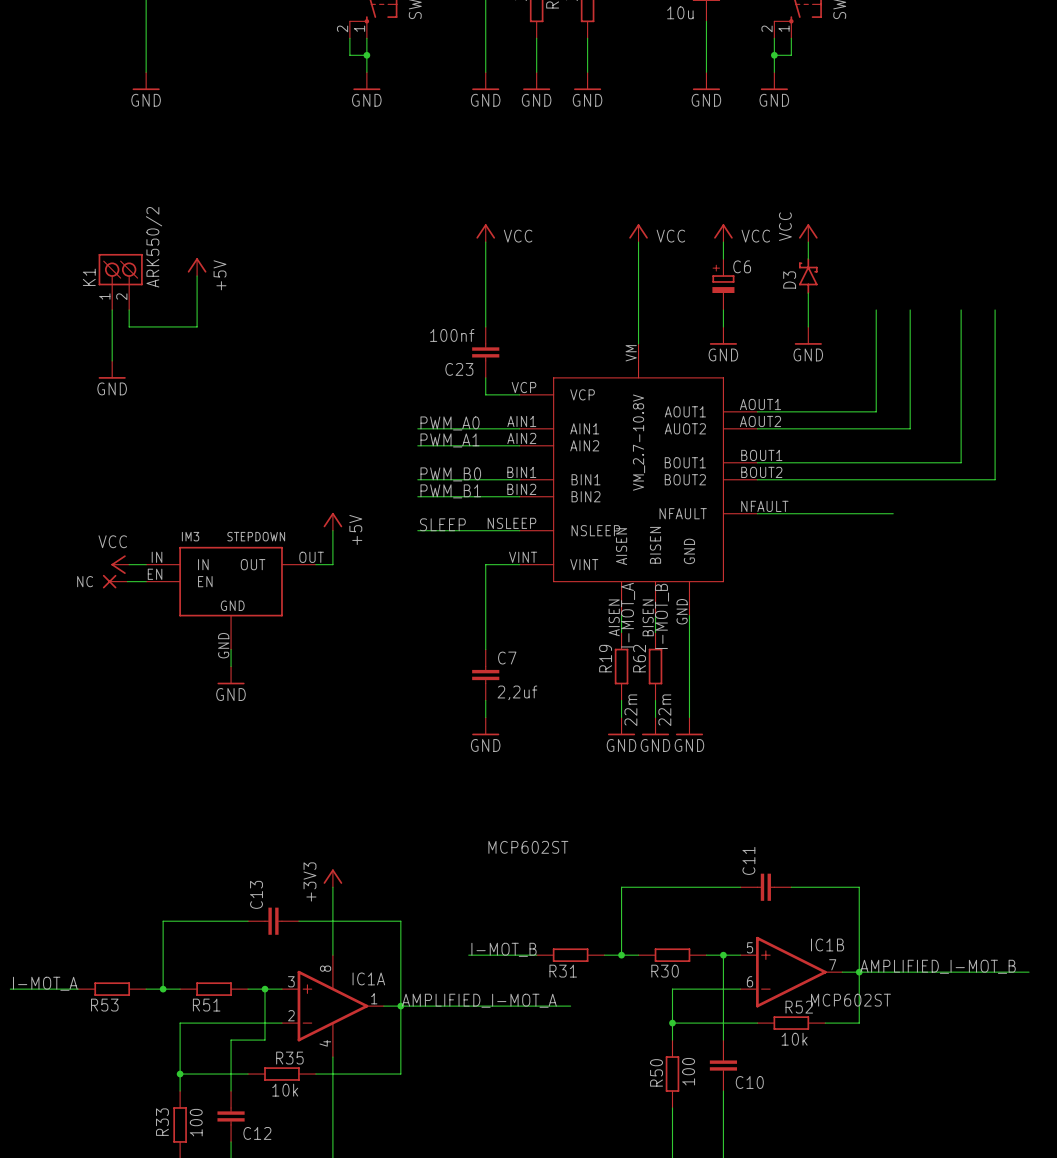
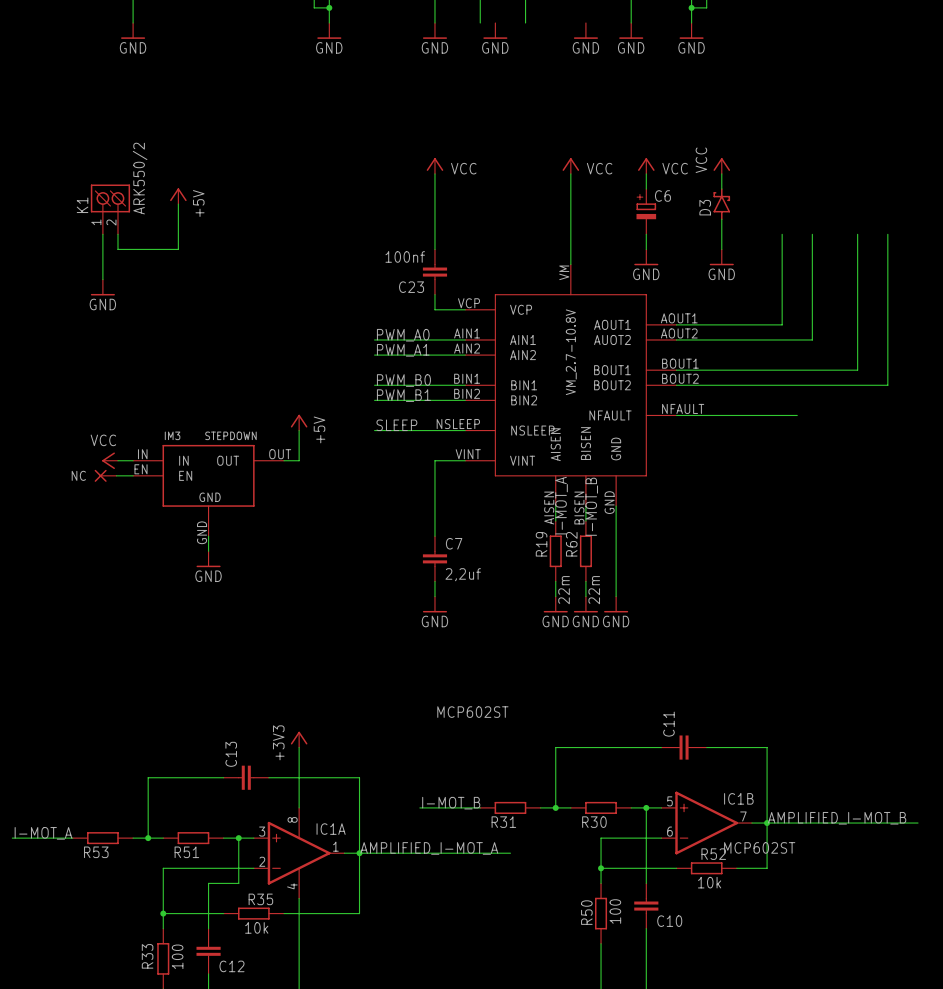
power symbol: GND (536, 81) -> none
power symbol: none -> GND (495, 30)
power symbol: GND (587, 81) -> none
power symbol: none -> GND (585, 30)

